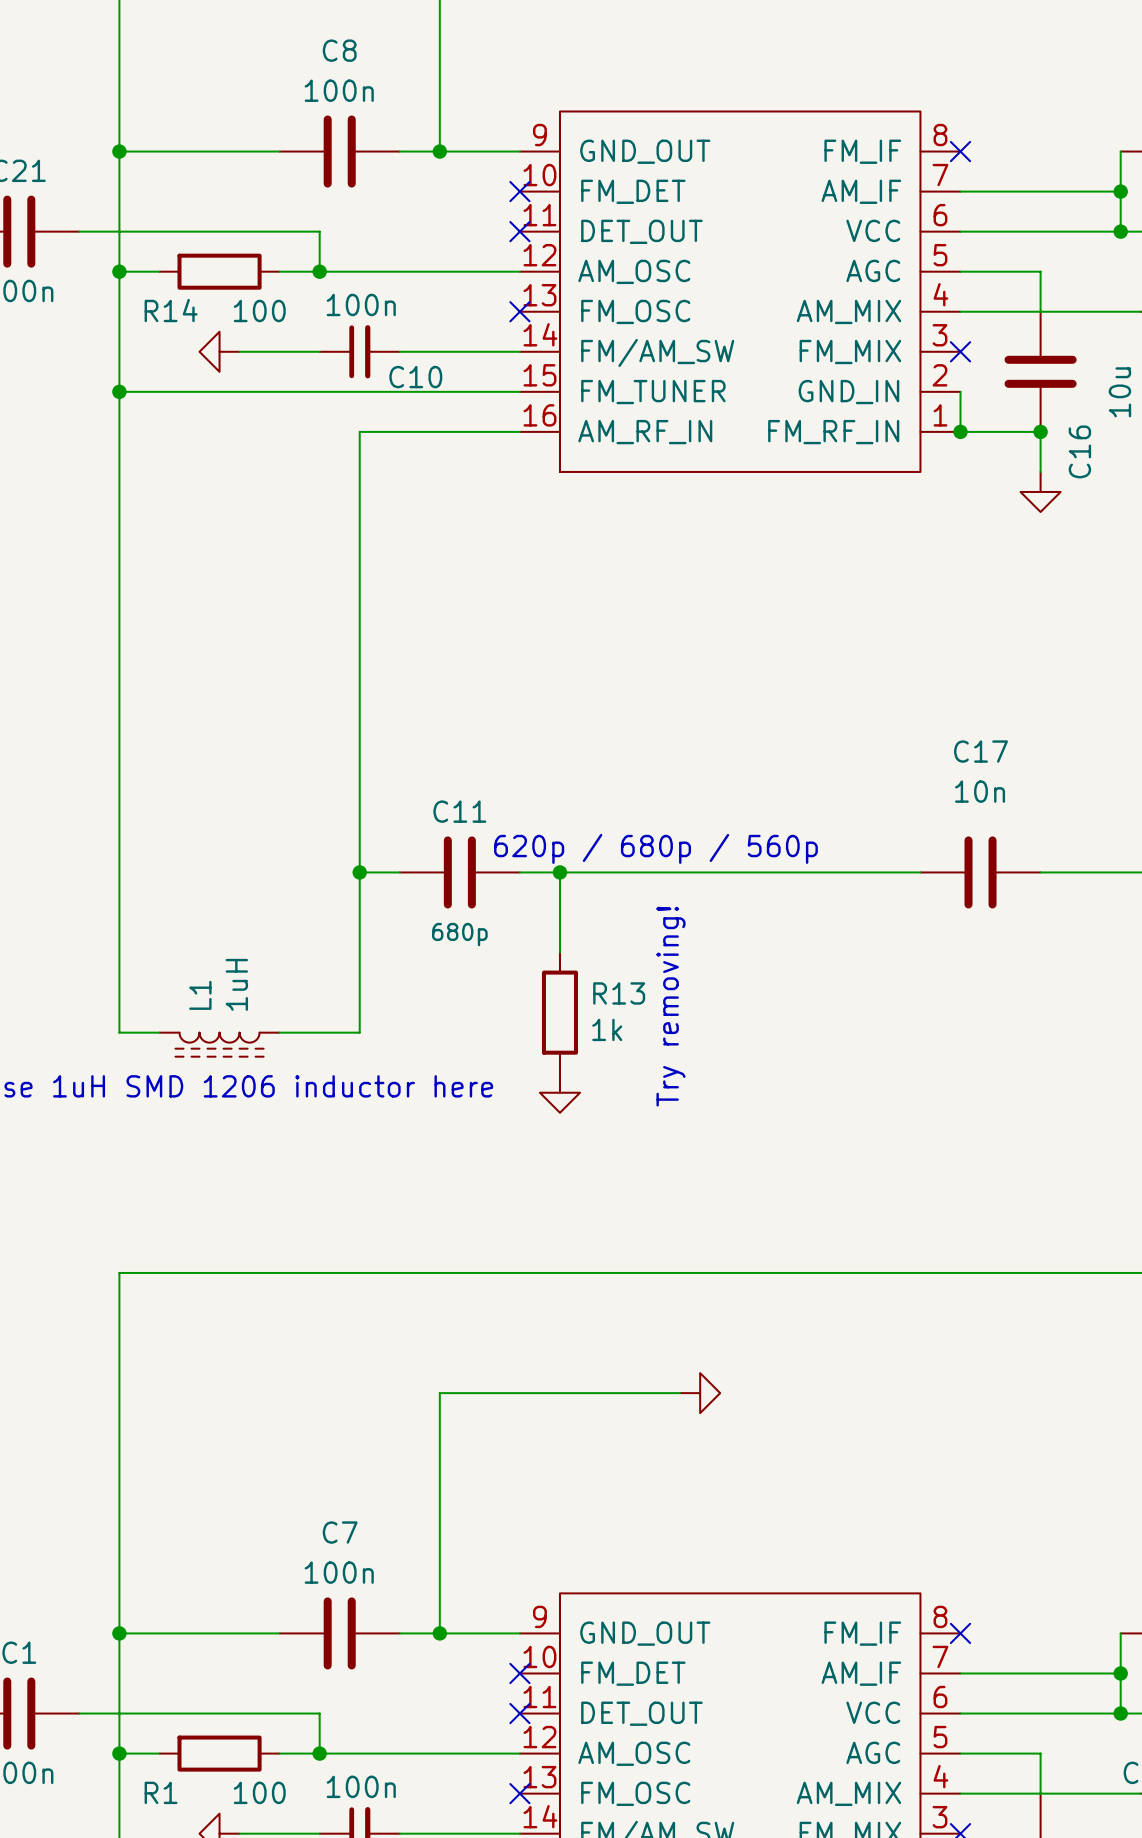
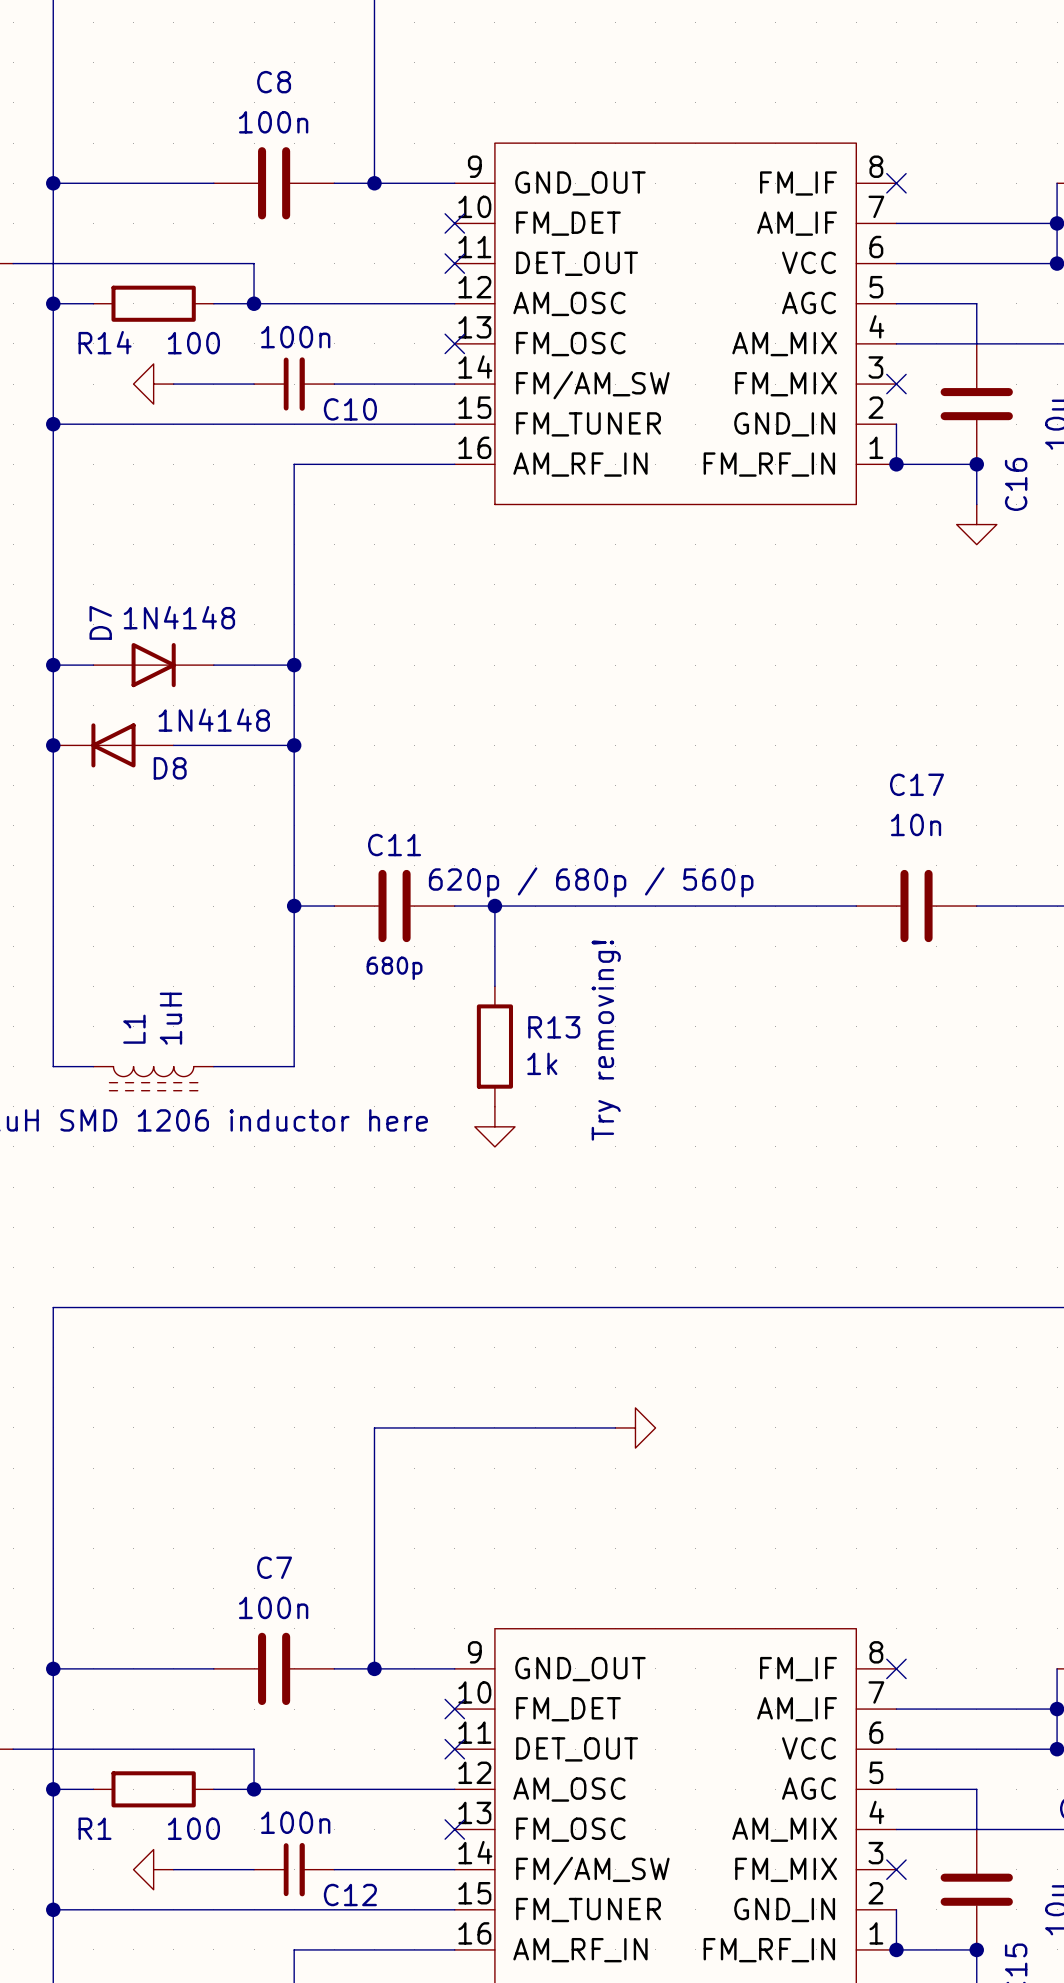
wire: none -> (53, 665) (93, 665)
junction: none -> (53, 665)
D7: none -> 1N4148 (153, 665)
wire: none -> (213, 665) (294, 665)
junction: none -> (294, 665)
junction: none -> (53, 745)
D8: none -> 1N4148 (113, 745)
wire: none -> (173, 745) (294, 745)
junction: none -> (294, 745)

